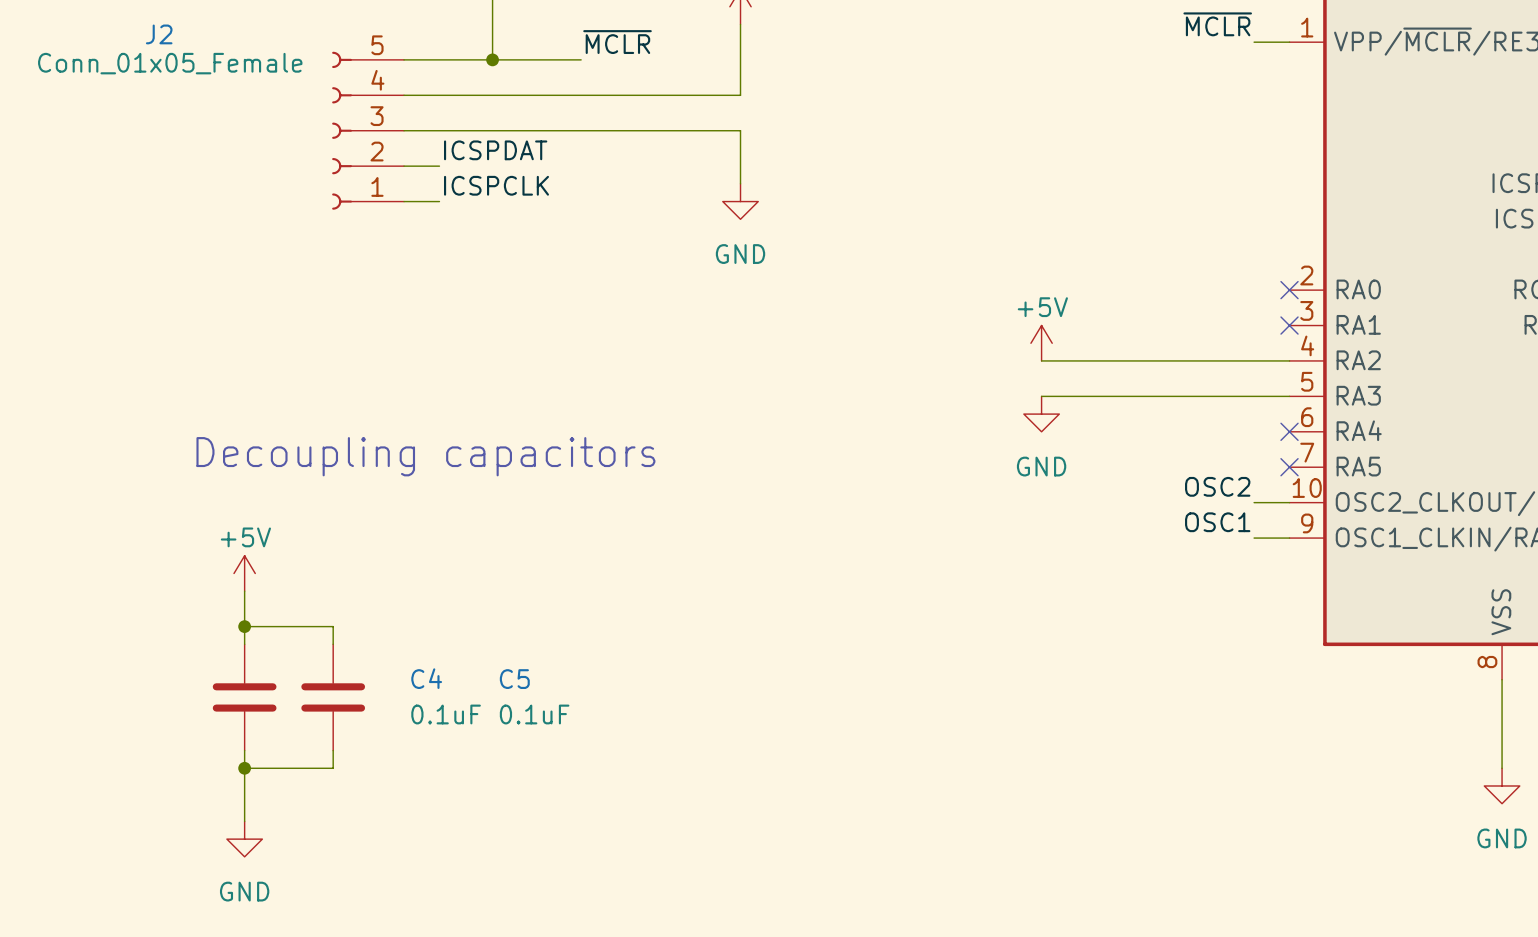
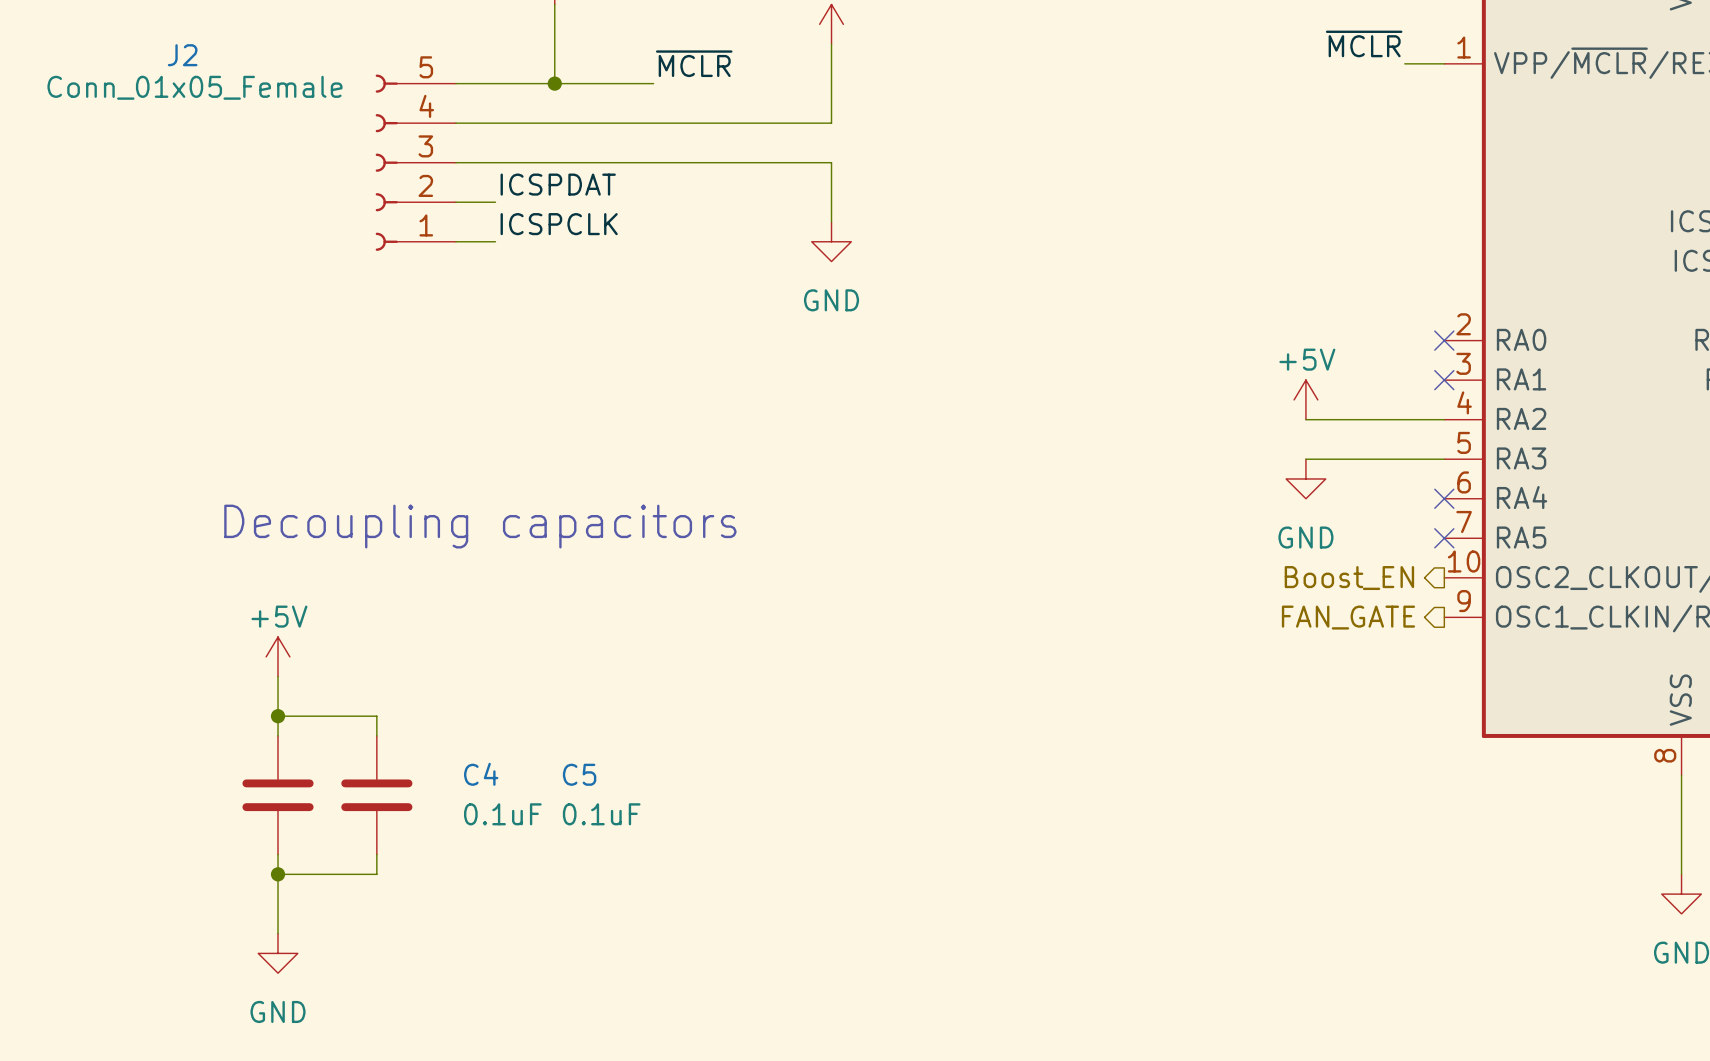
power symbol position: +5V (1041, 343) -> +5V (1305, 399)
wire: (1041, 360) (1165, 360) -> none
wire: (1041, 396) (1165, 396) -> none
power symbol position: GND (1041, 414) -> GND (1305, 478)
label: OSC2 (1217, 486) -> none
hierarchical label: none -> Boost_EN (1349, 578)
wire: (1254, 502) (1289, 502) -> none
label: OSC1 (1217, 522) -> none
hierarchical label: none -> FAN_GATE (1348, 617)
wire: (1254, 538) (1289, 538) -> none

